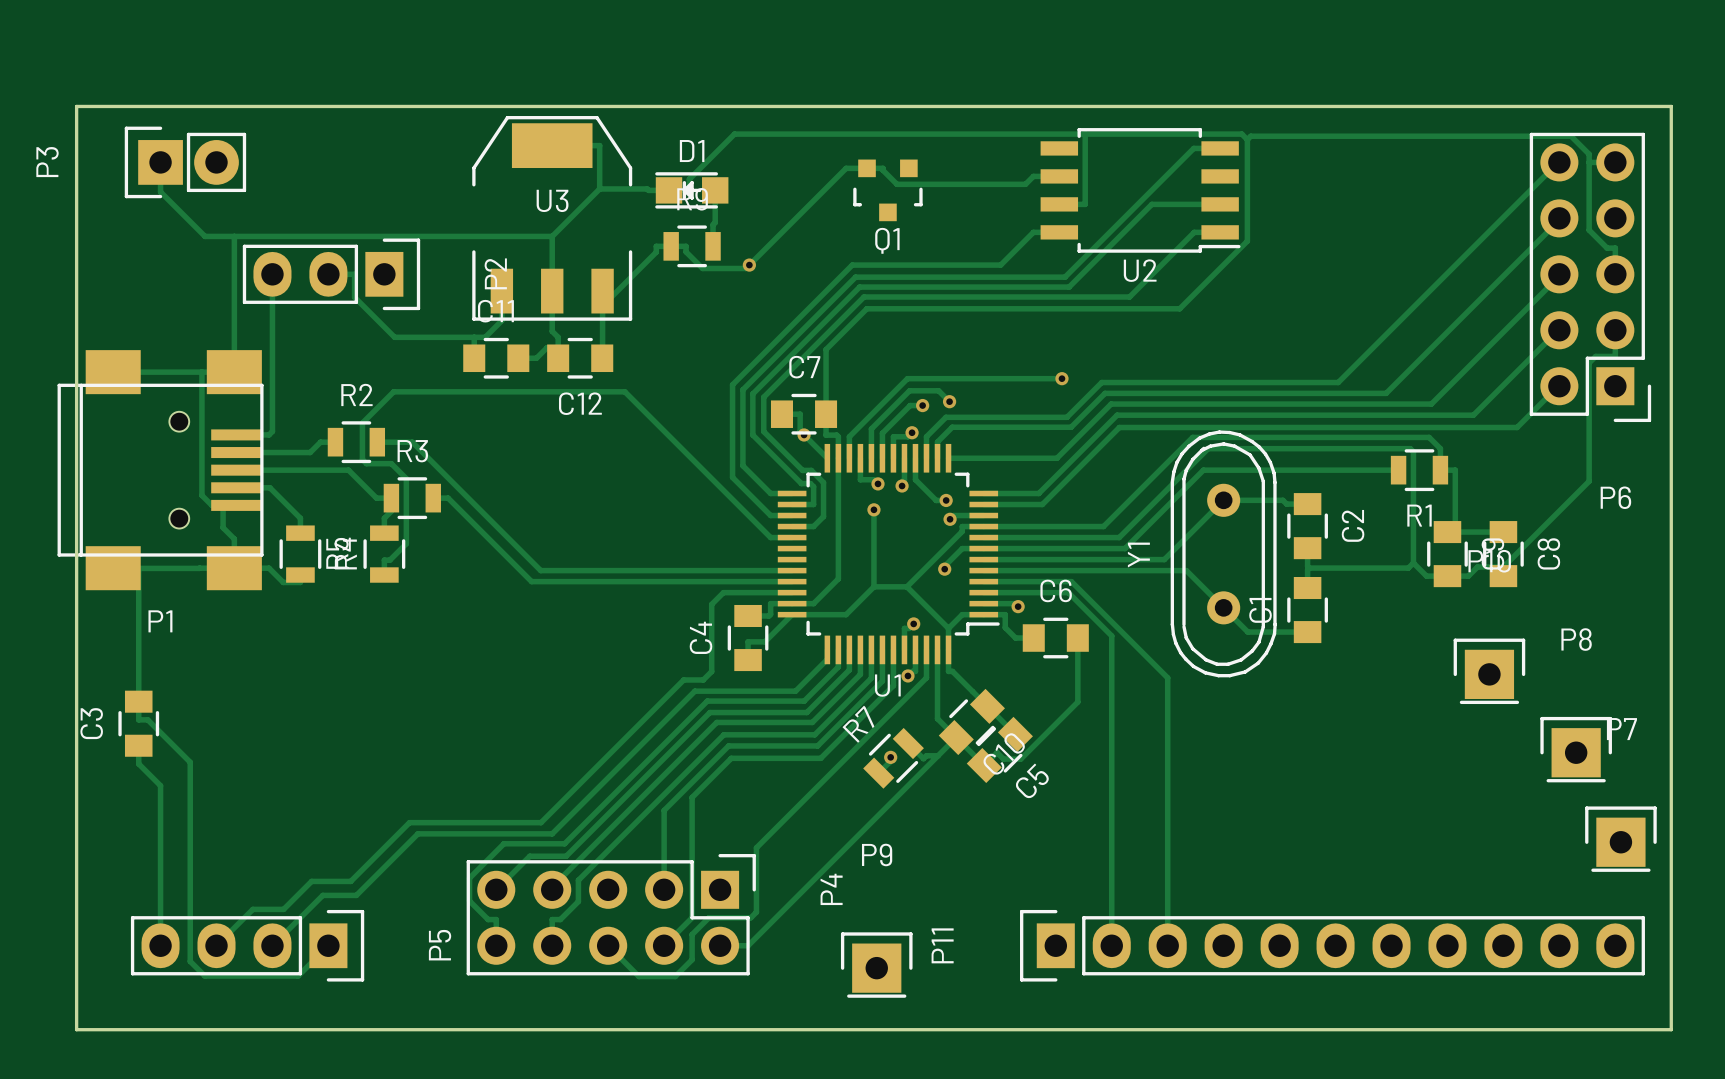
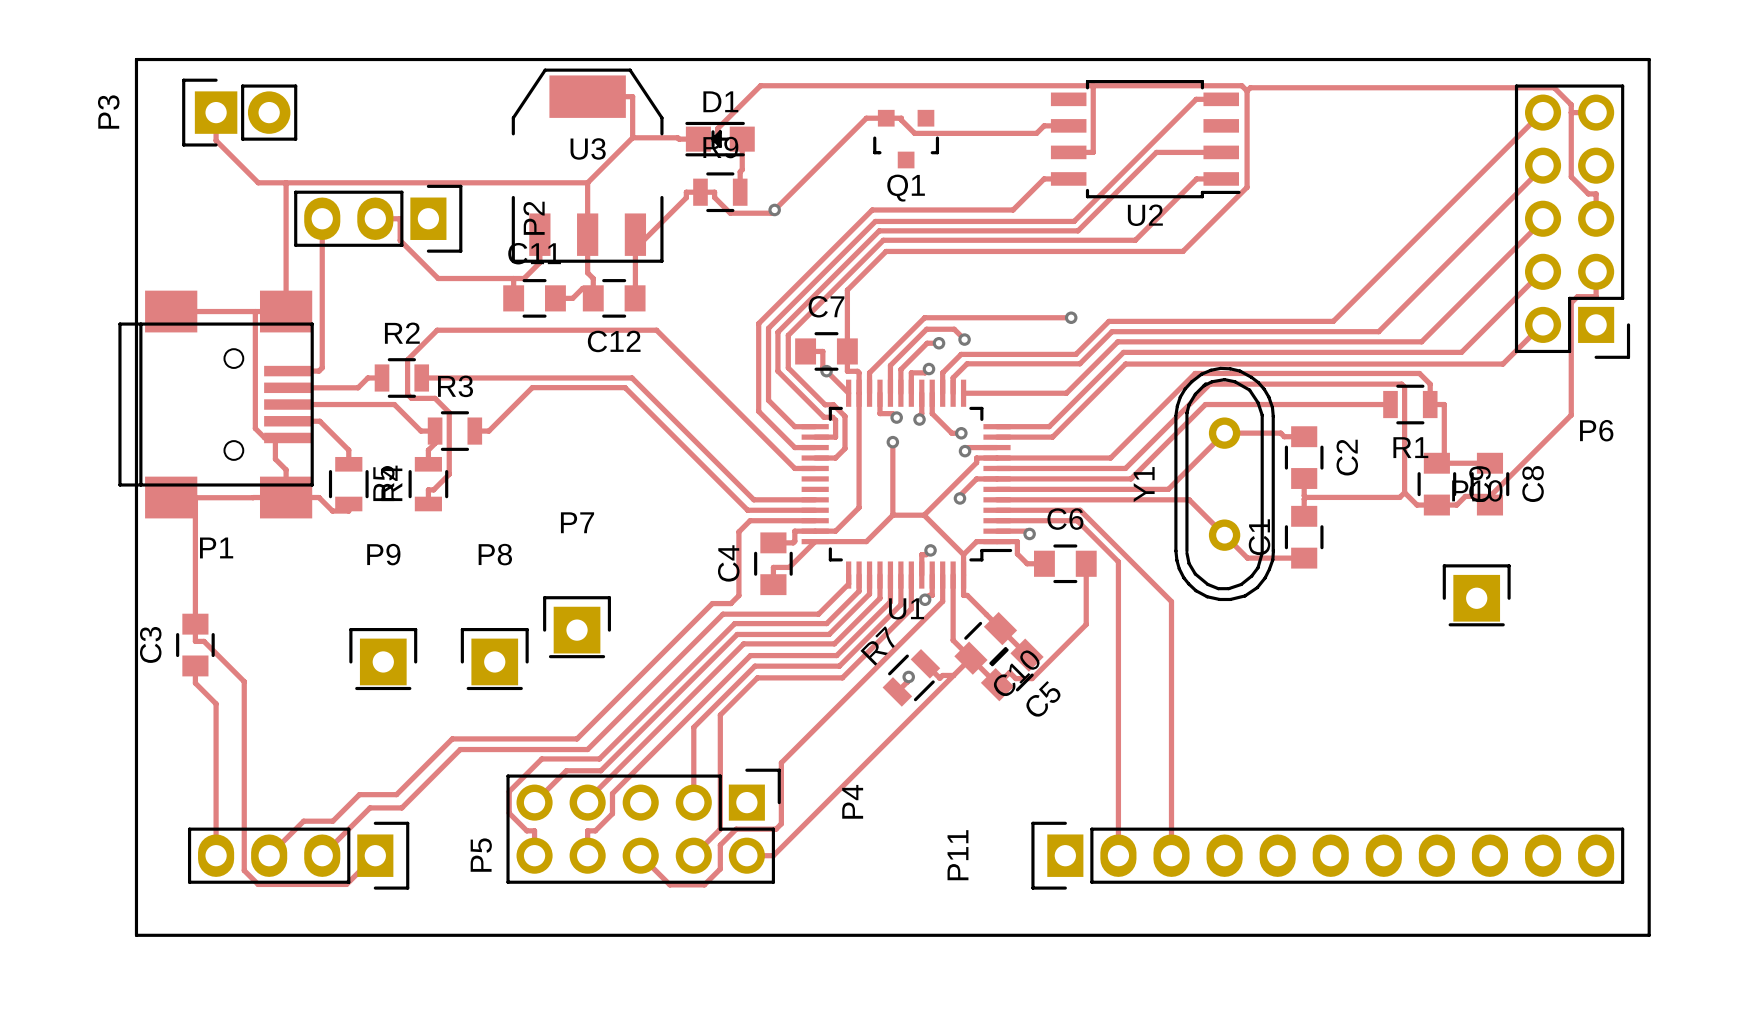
track: (412, 442) (540, 570) (727, 570) -> (454, 377) (632, 377) (753, 499)
track: (448, 498) (531, 581) (720, 581) -> (488, 431) (532, 387) (625, 387) (747, 510)
P8 position: (1576, 749) -> (494, 659)
P7 position: (1620, 839) -> (577, 627)
P9 position: (876, 965) -> (383, 659)

